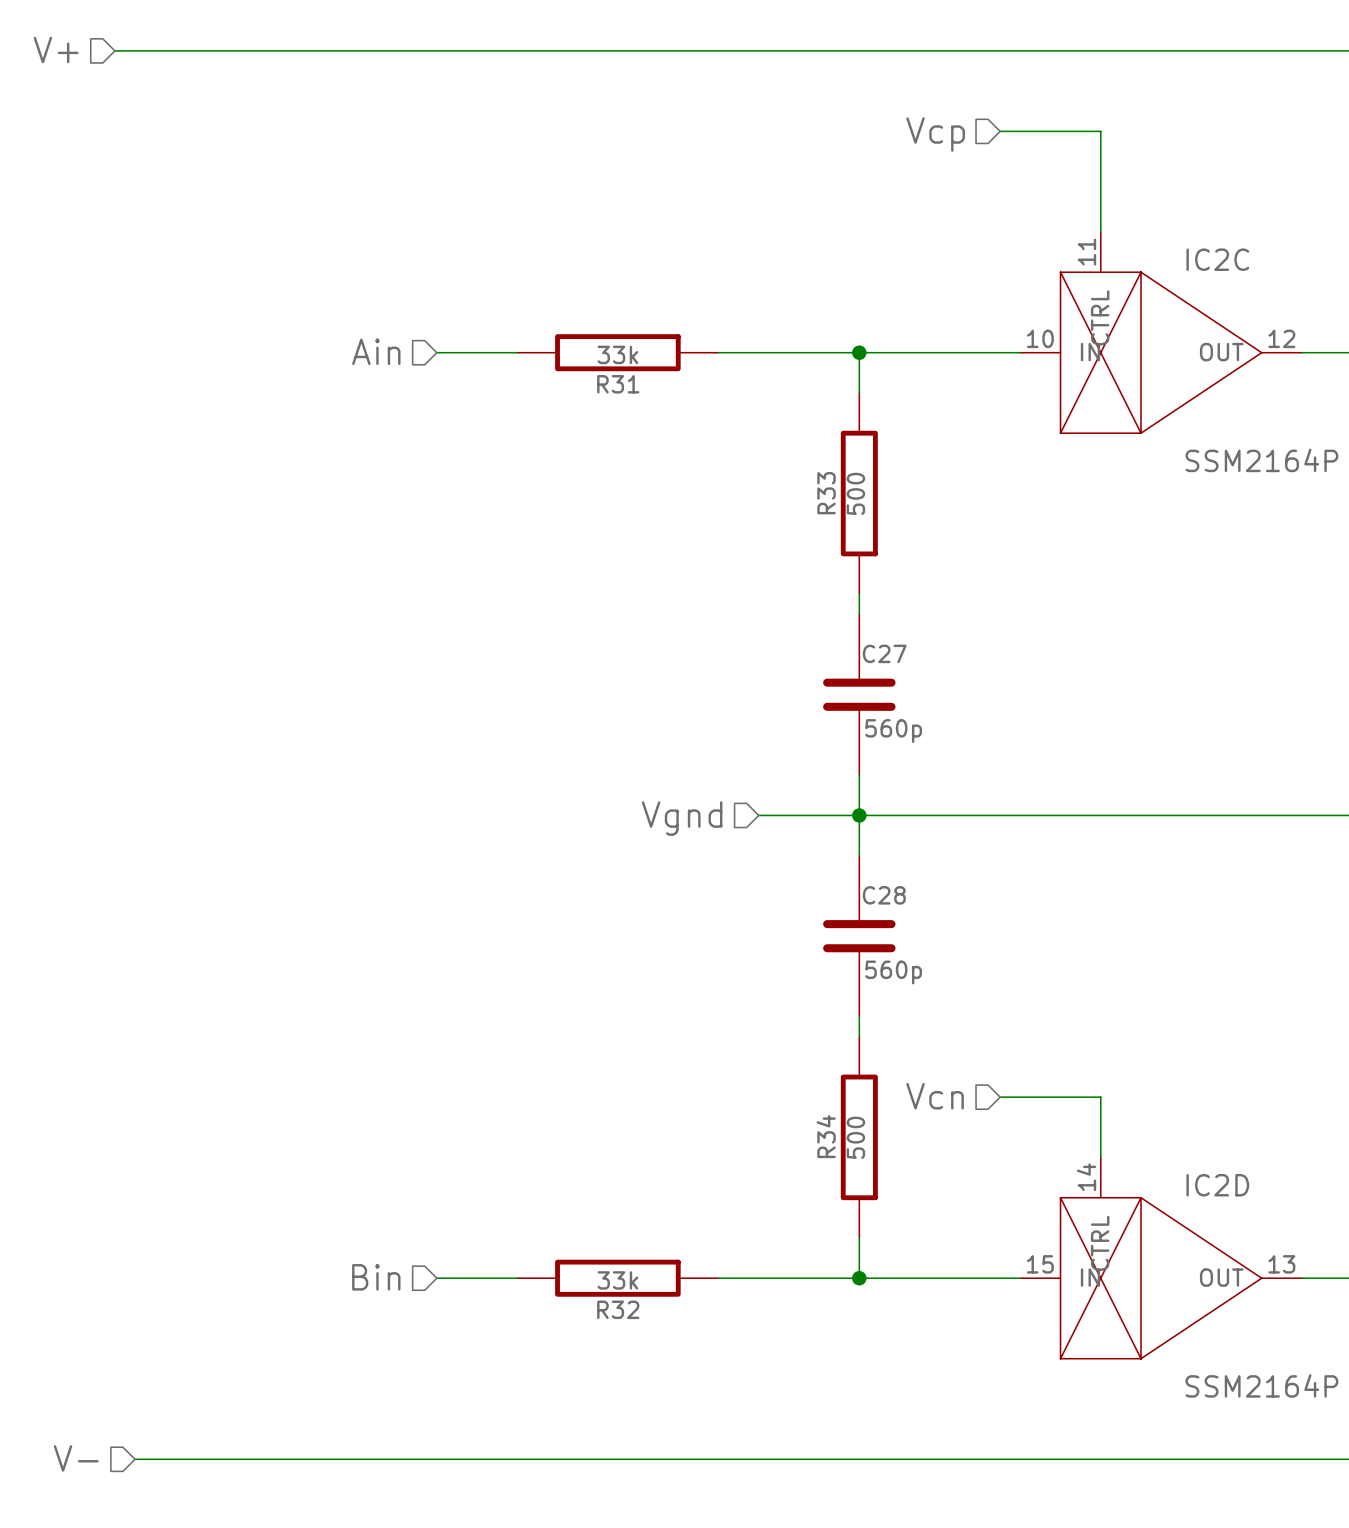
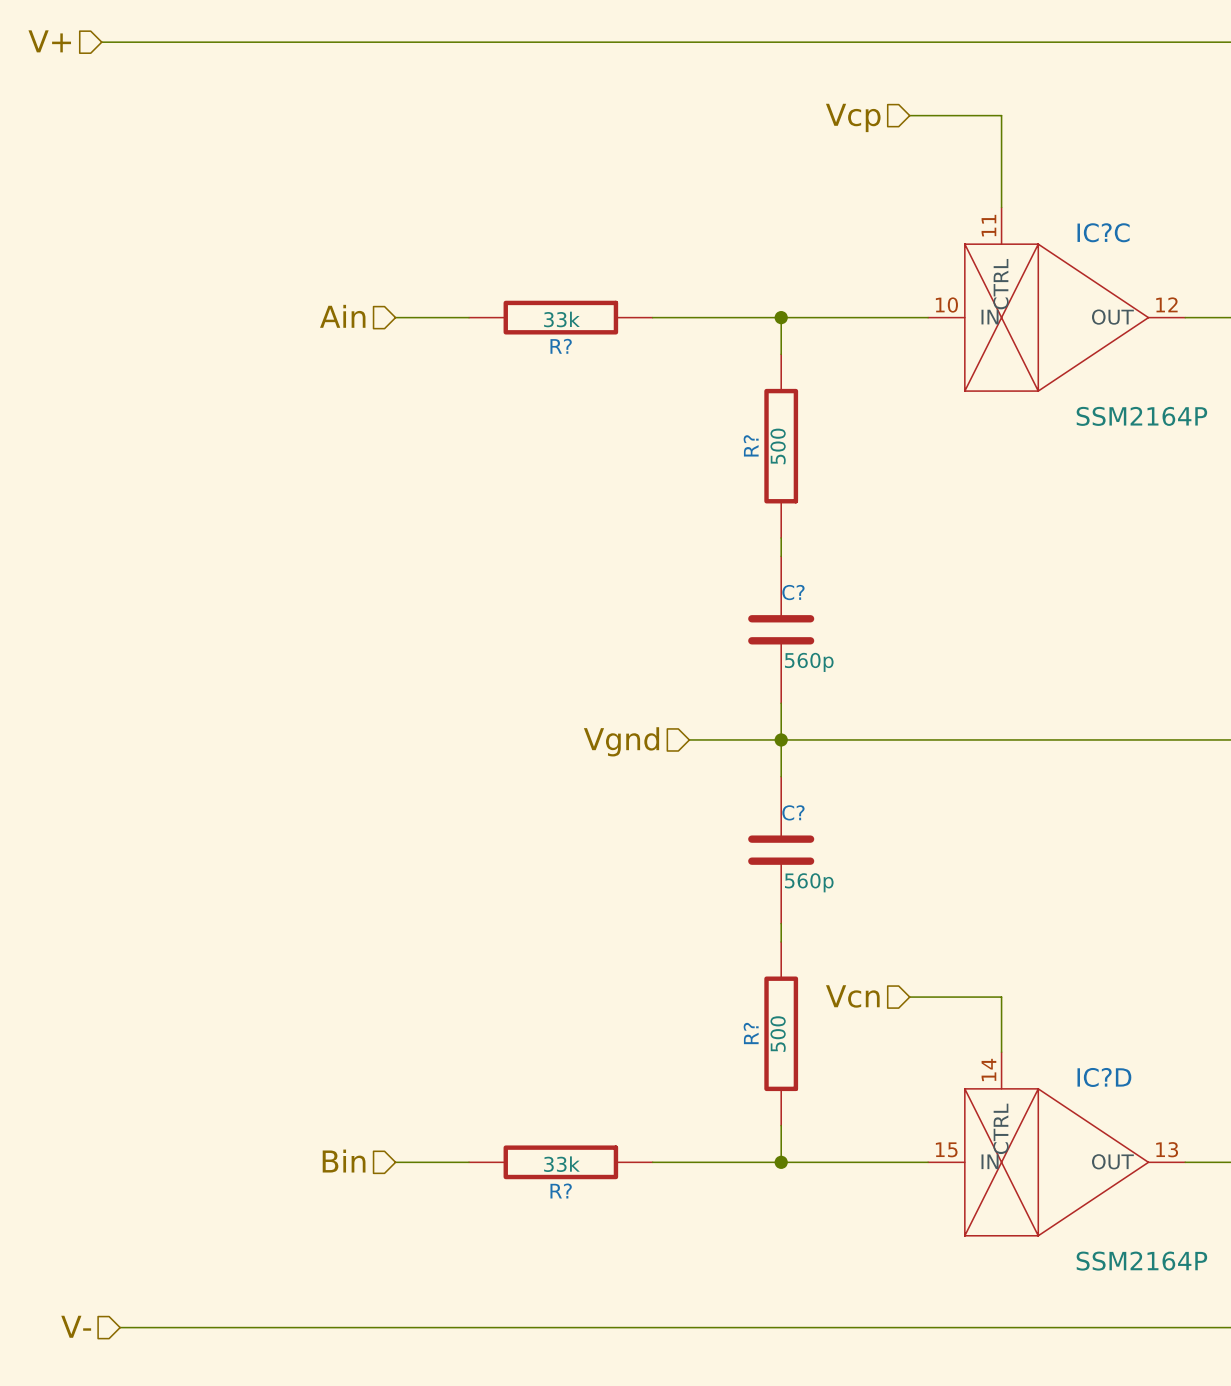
IC2C name: IC2C (1217, 259) -> IC?C (1103, 232)
R31 name: R31 (618, 384) -> R? (561, 346)
R33 name: R33 (826, 493) -> R? (751, 445)
C27 name: C27 (884, 653) -> C? (793, 592)
C28 name: C28 (884, 895) -> C? (793, 812)
R34 name: R34 (826, 1136) -> R? (751, 1033)
IC2D name: IC2D (1217, 1185) -> IC?D (1104, 1077)
R32 name: R32 (618, 1309) -> R? (561, 1191)

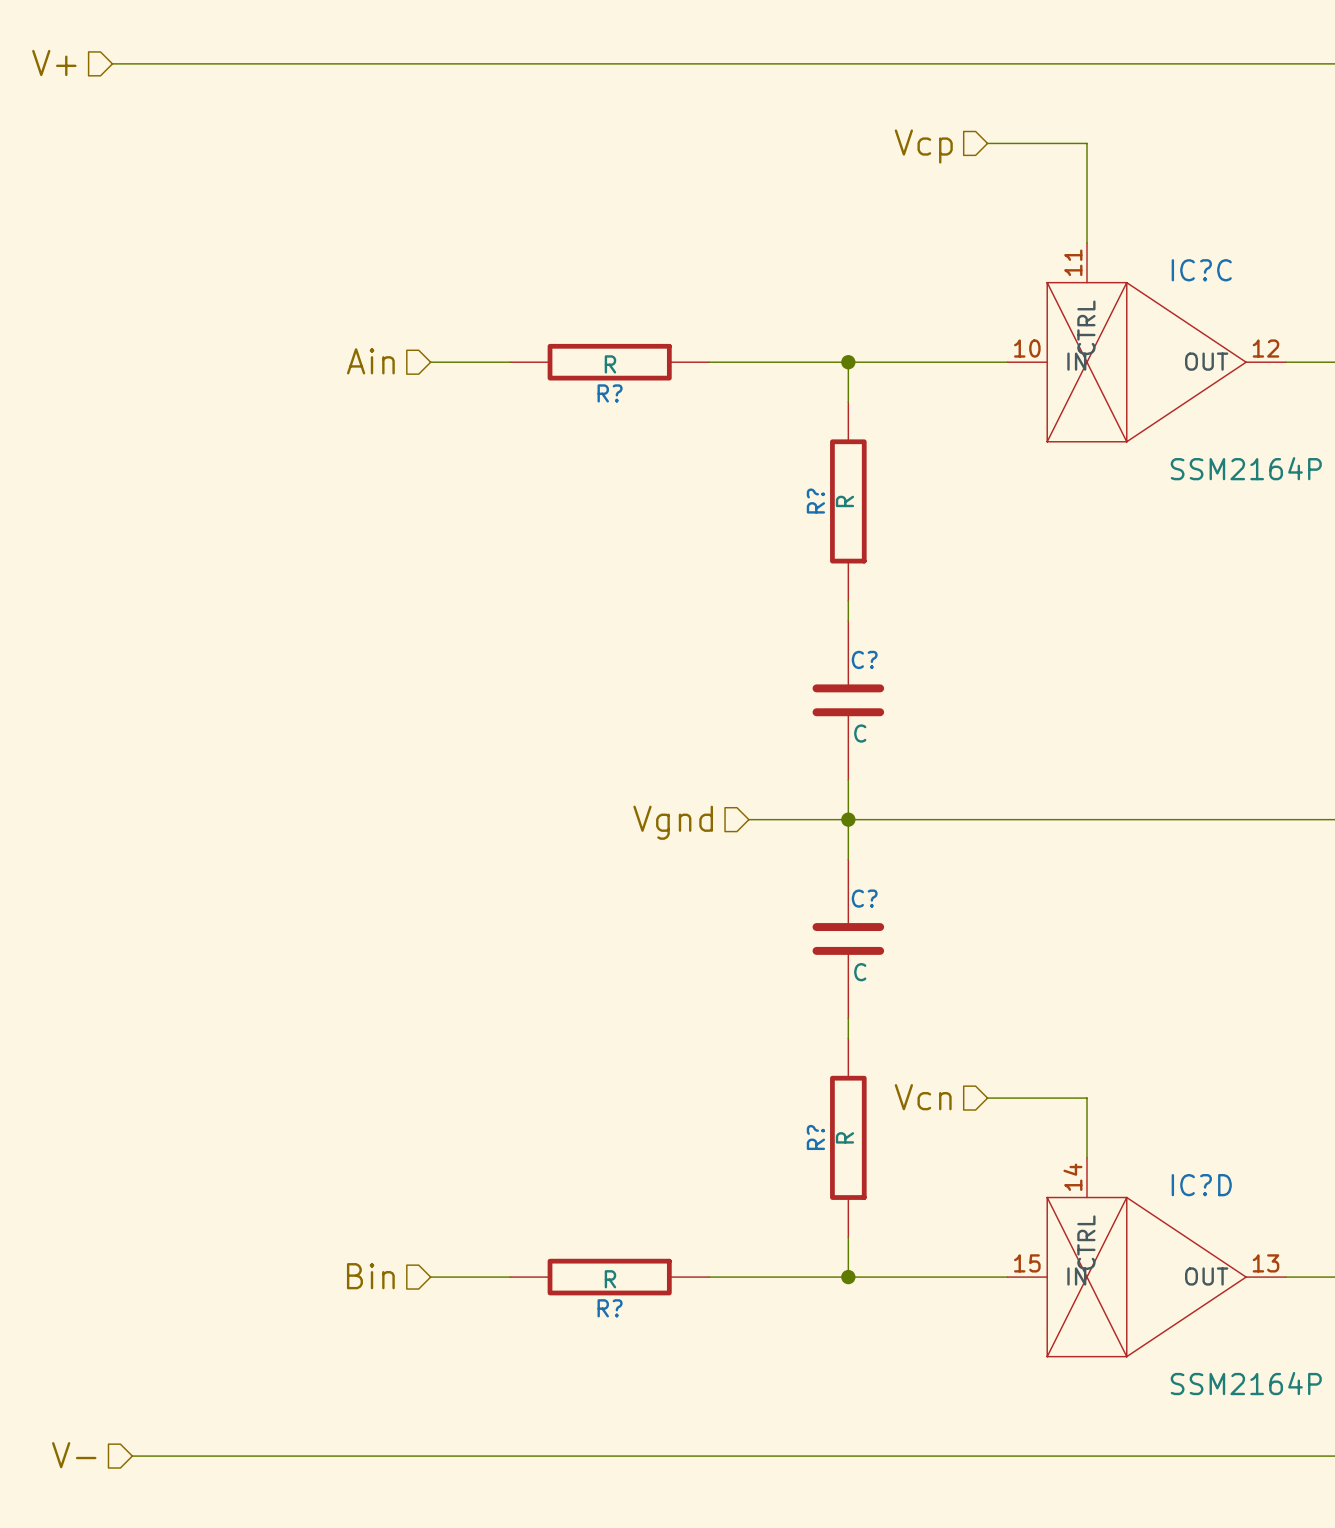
R? value: 33k (561, 319) -> R (610, 364)
R? value: 500 (778, 446) -> R (844, 501)
C? value: 560p (809, 662) -> C (860, 733)
C? value: 560p (809, 882) -> C (860, 972)
R? value: 500 (778, 1034) -> R (844, 1137)
R? value: 33k (561, 1164) -> R (610, 1279)

